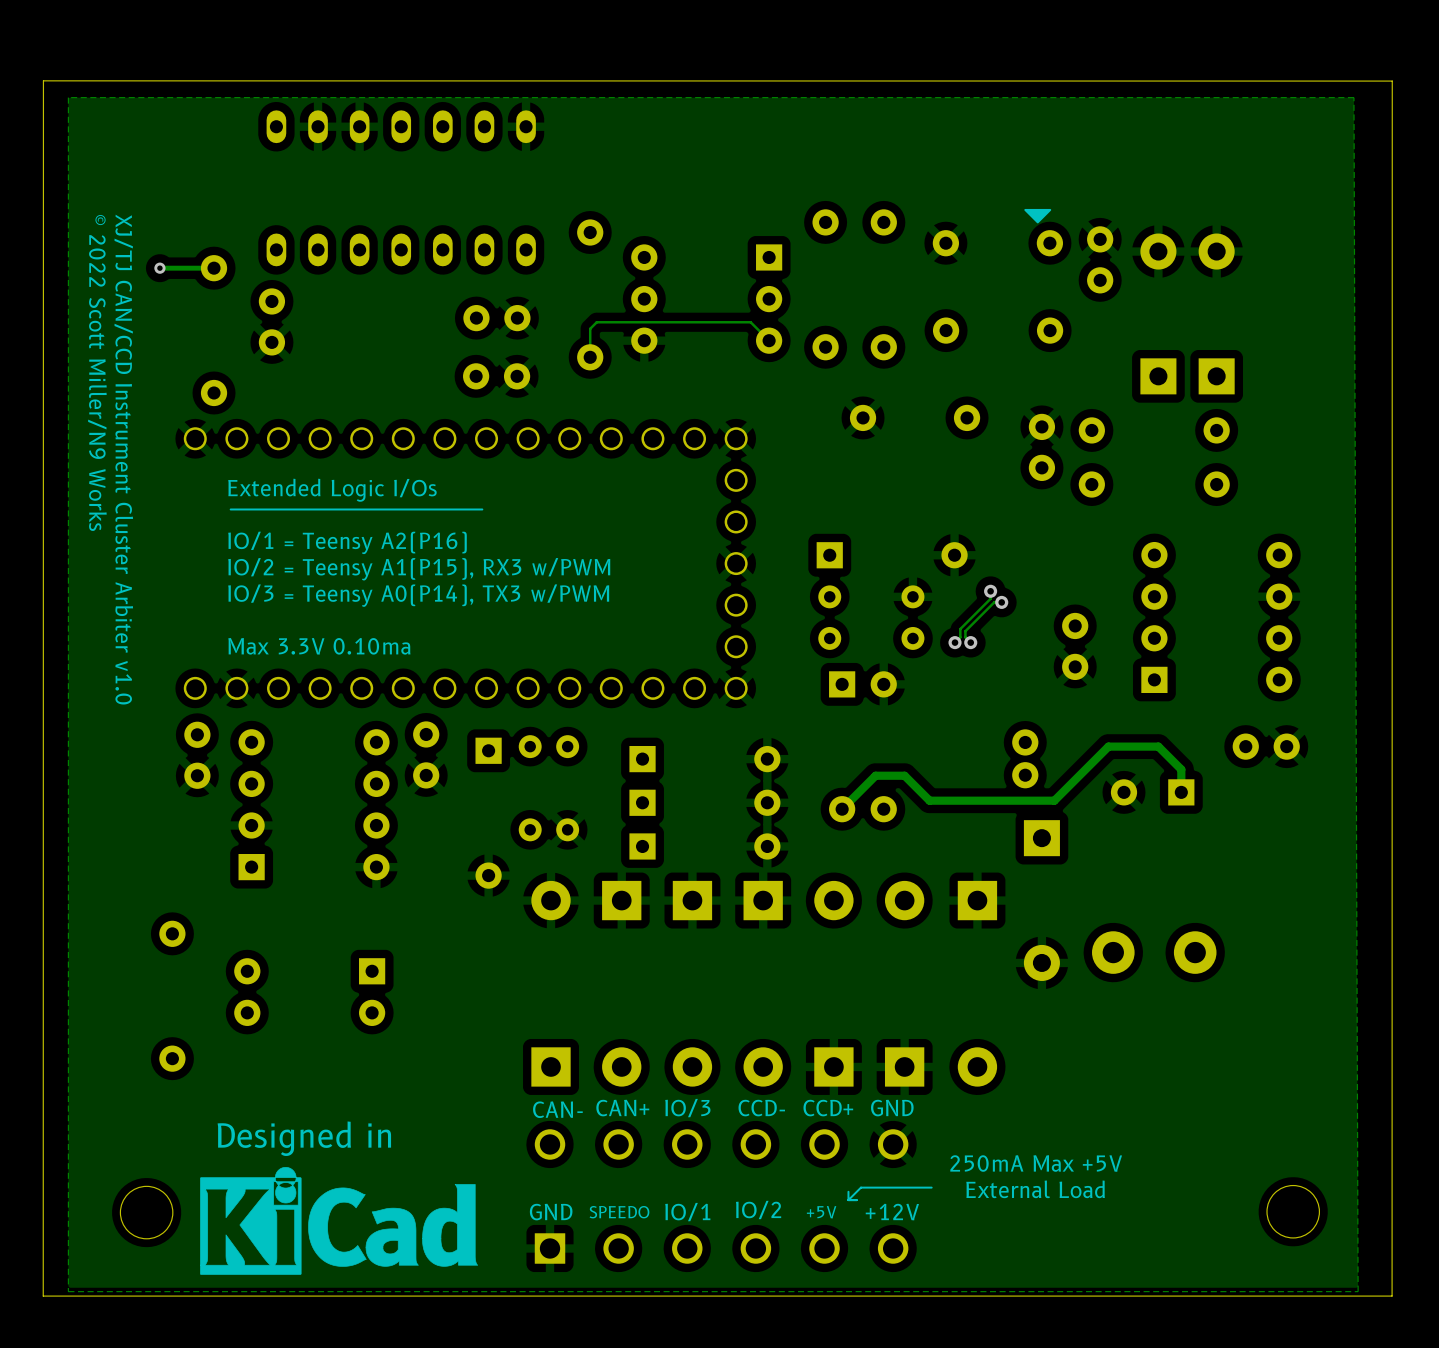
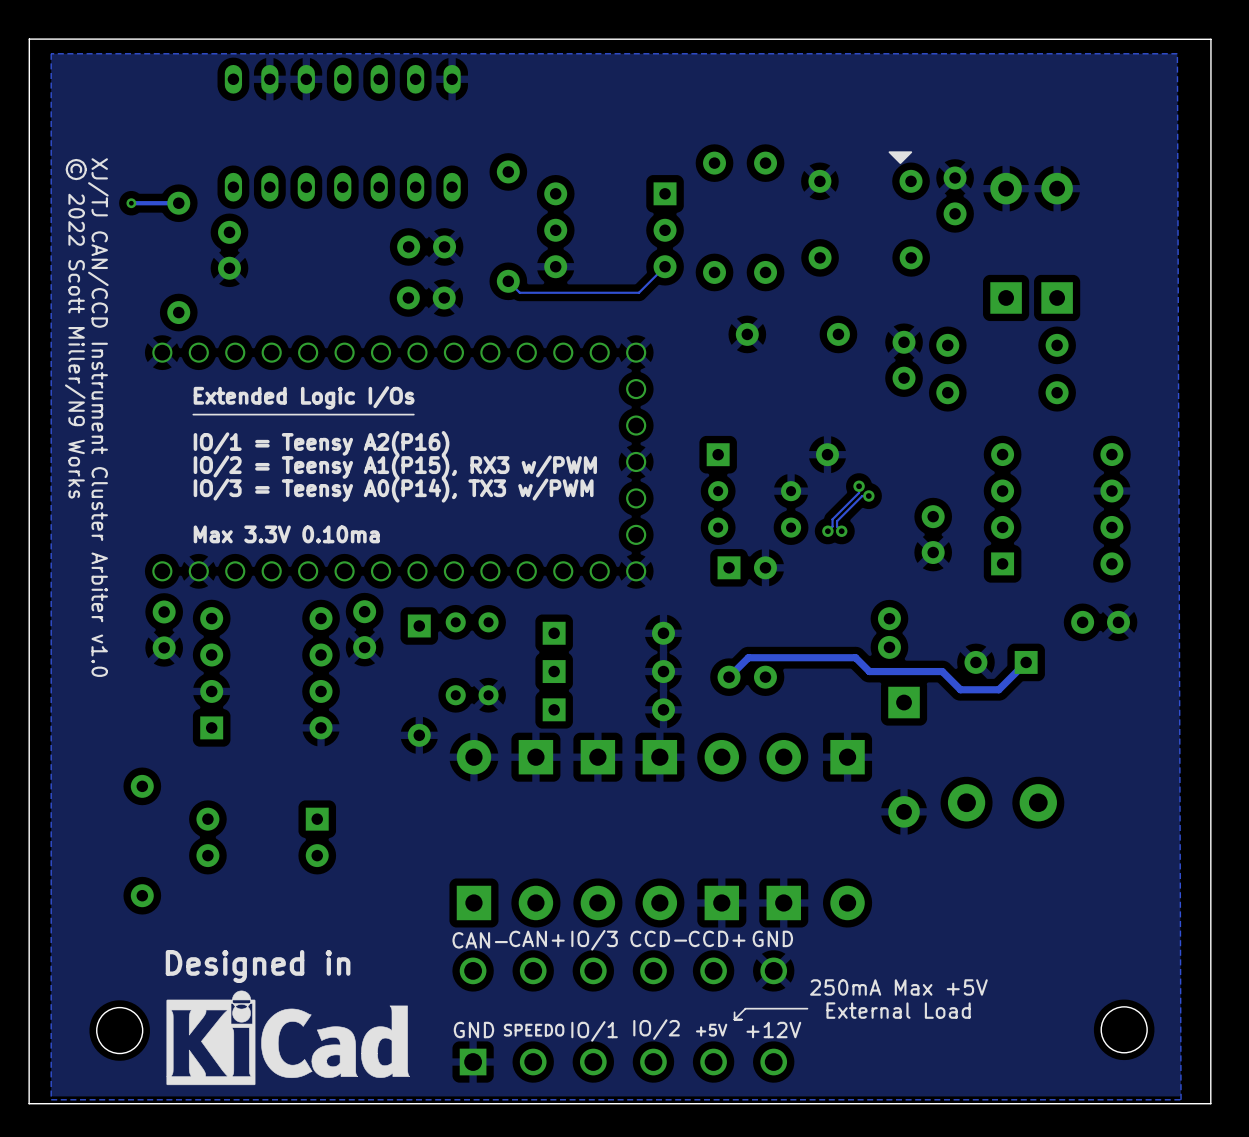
track: (769, 340) (750, 322) (596, 322) (590, 328) (590, 357) -> (665, 266) (638, 292) (519, 292) (508, 281)
track: (864, 787) (875, 775) (904, 775) (929, 800) (1054, 800) (1108, 746) (1158, 746) (1181, 769) (1181, 792) (1175, 792) -> (748, 657) (855, 657) (869, 671) (942, 671) (960, 689) (998, 689) (1026, 662)

